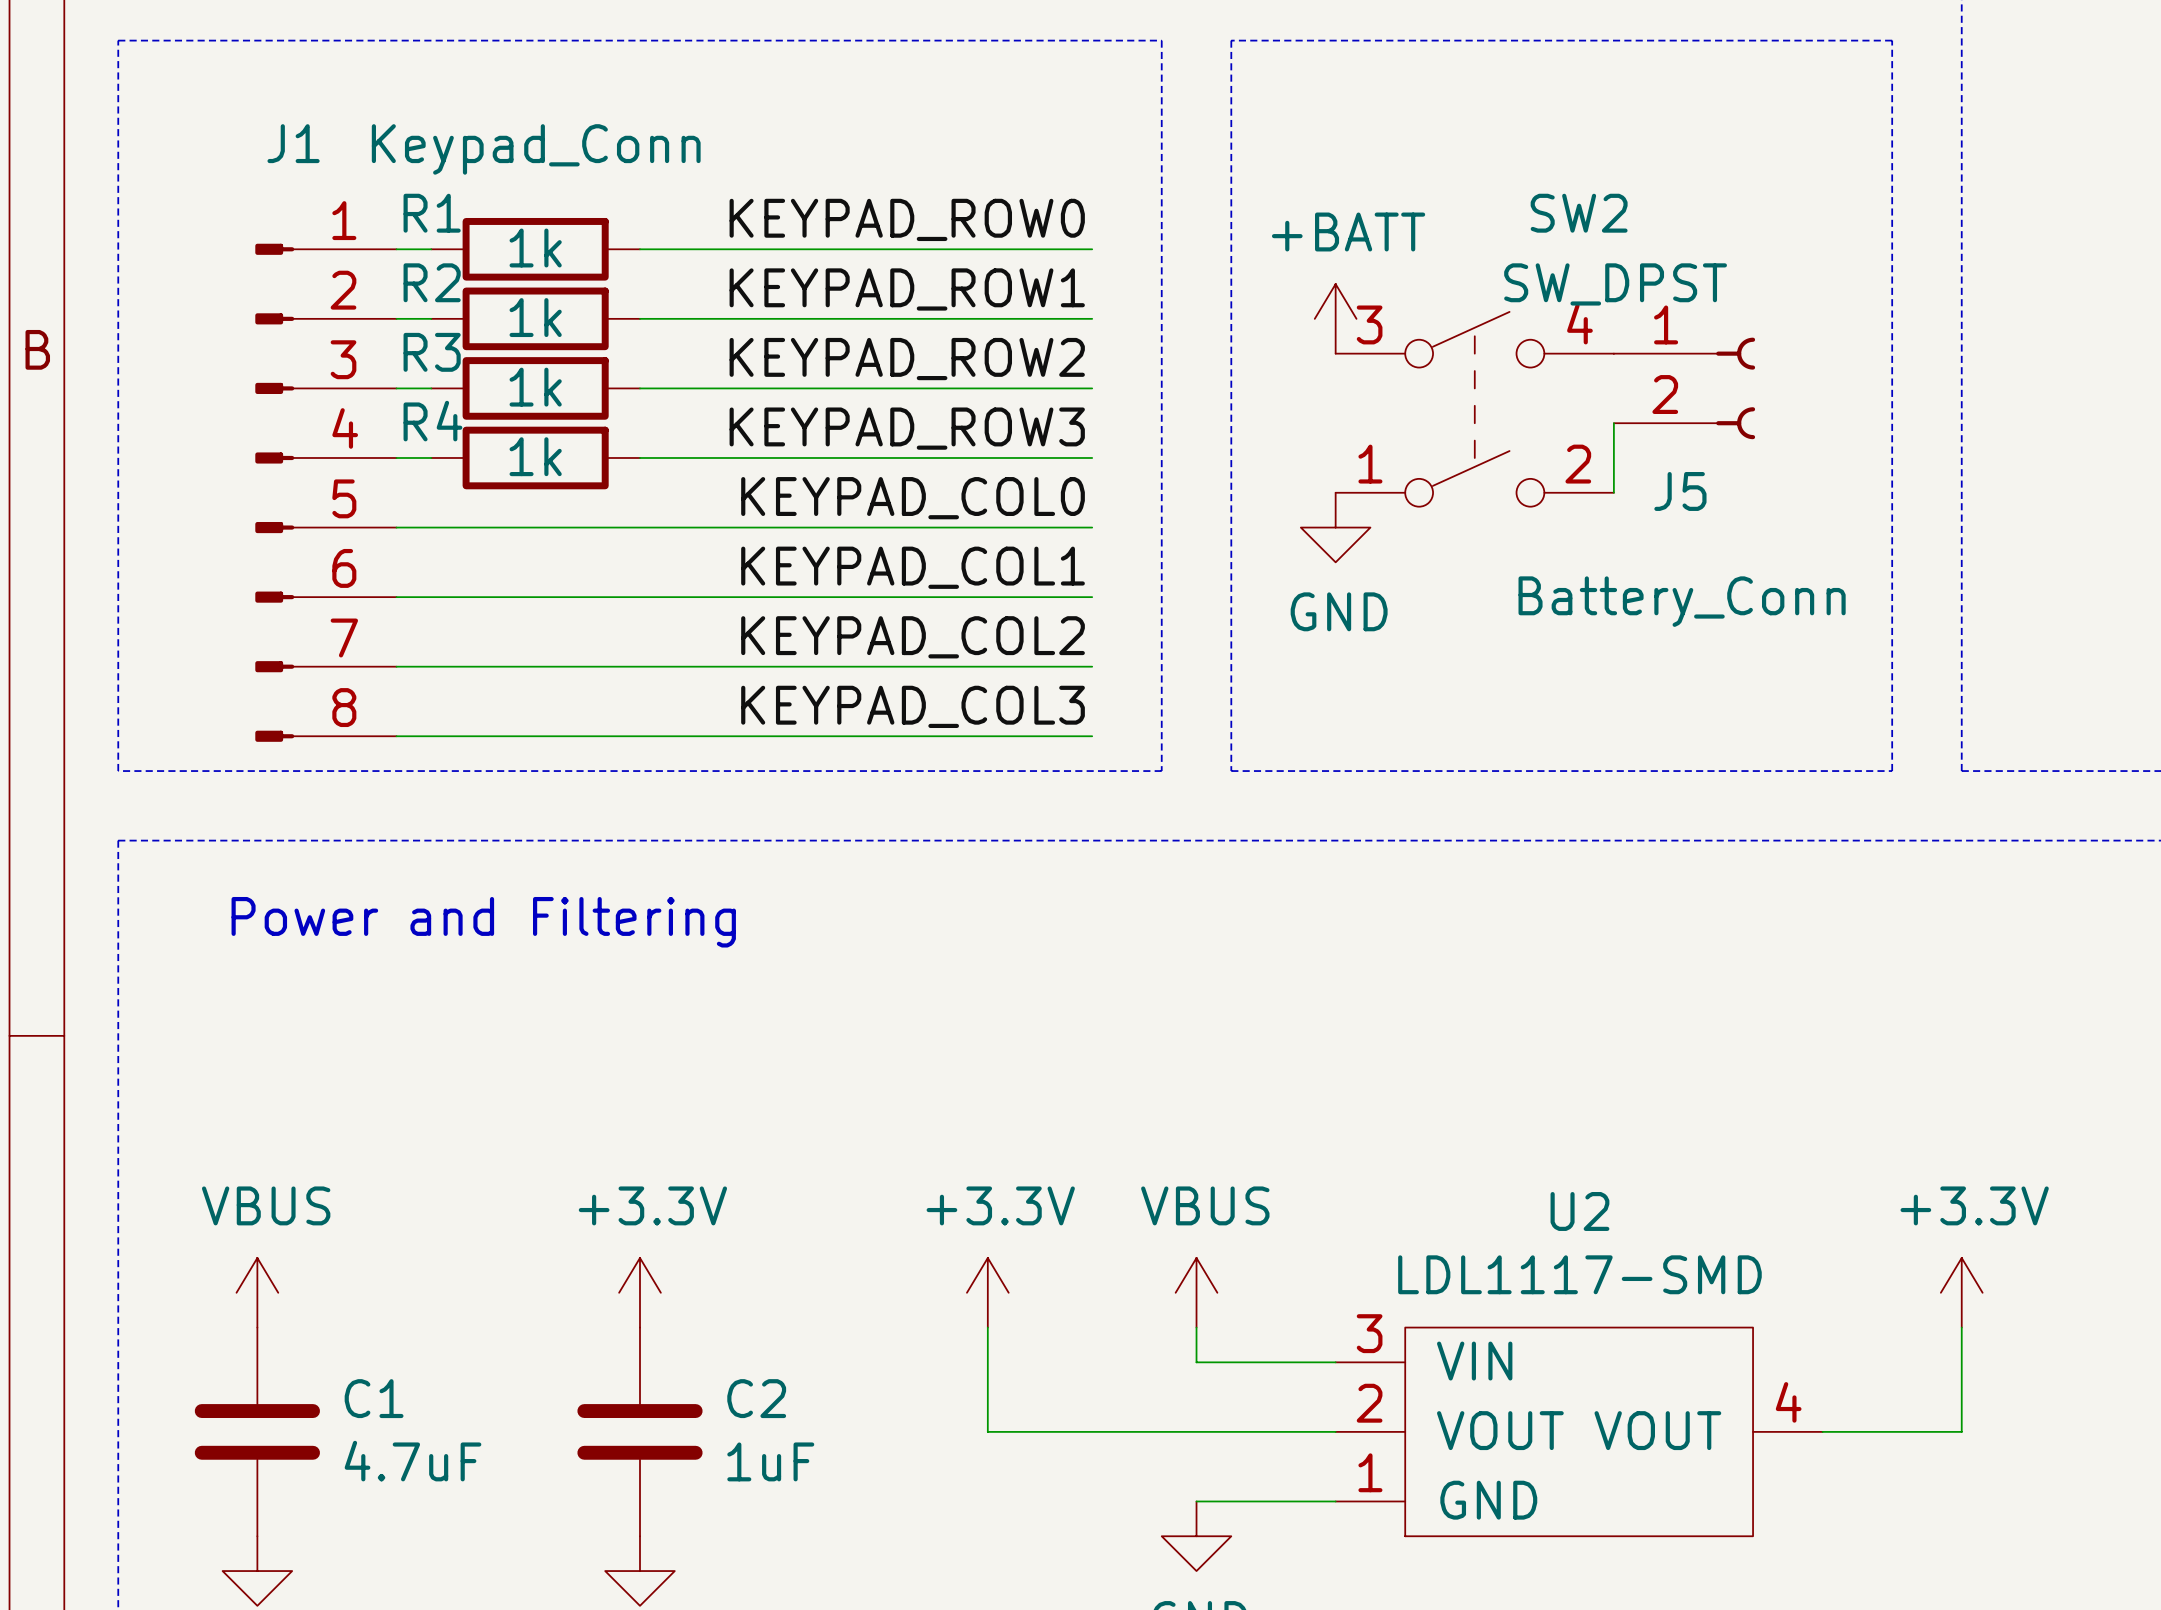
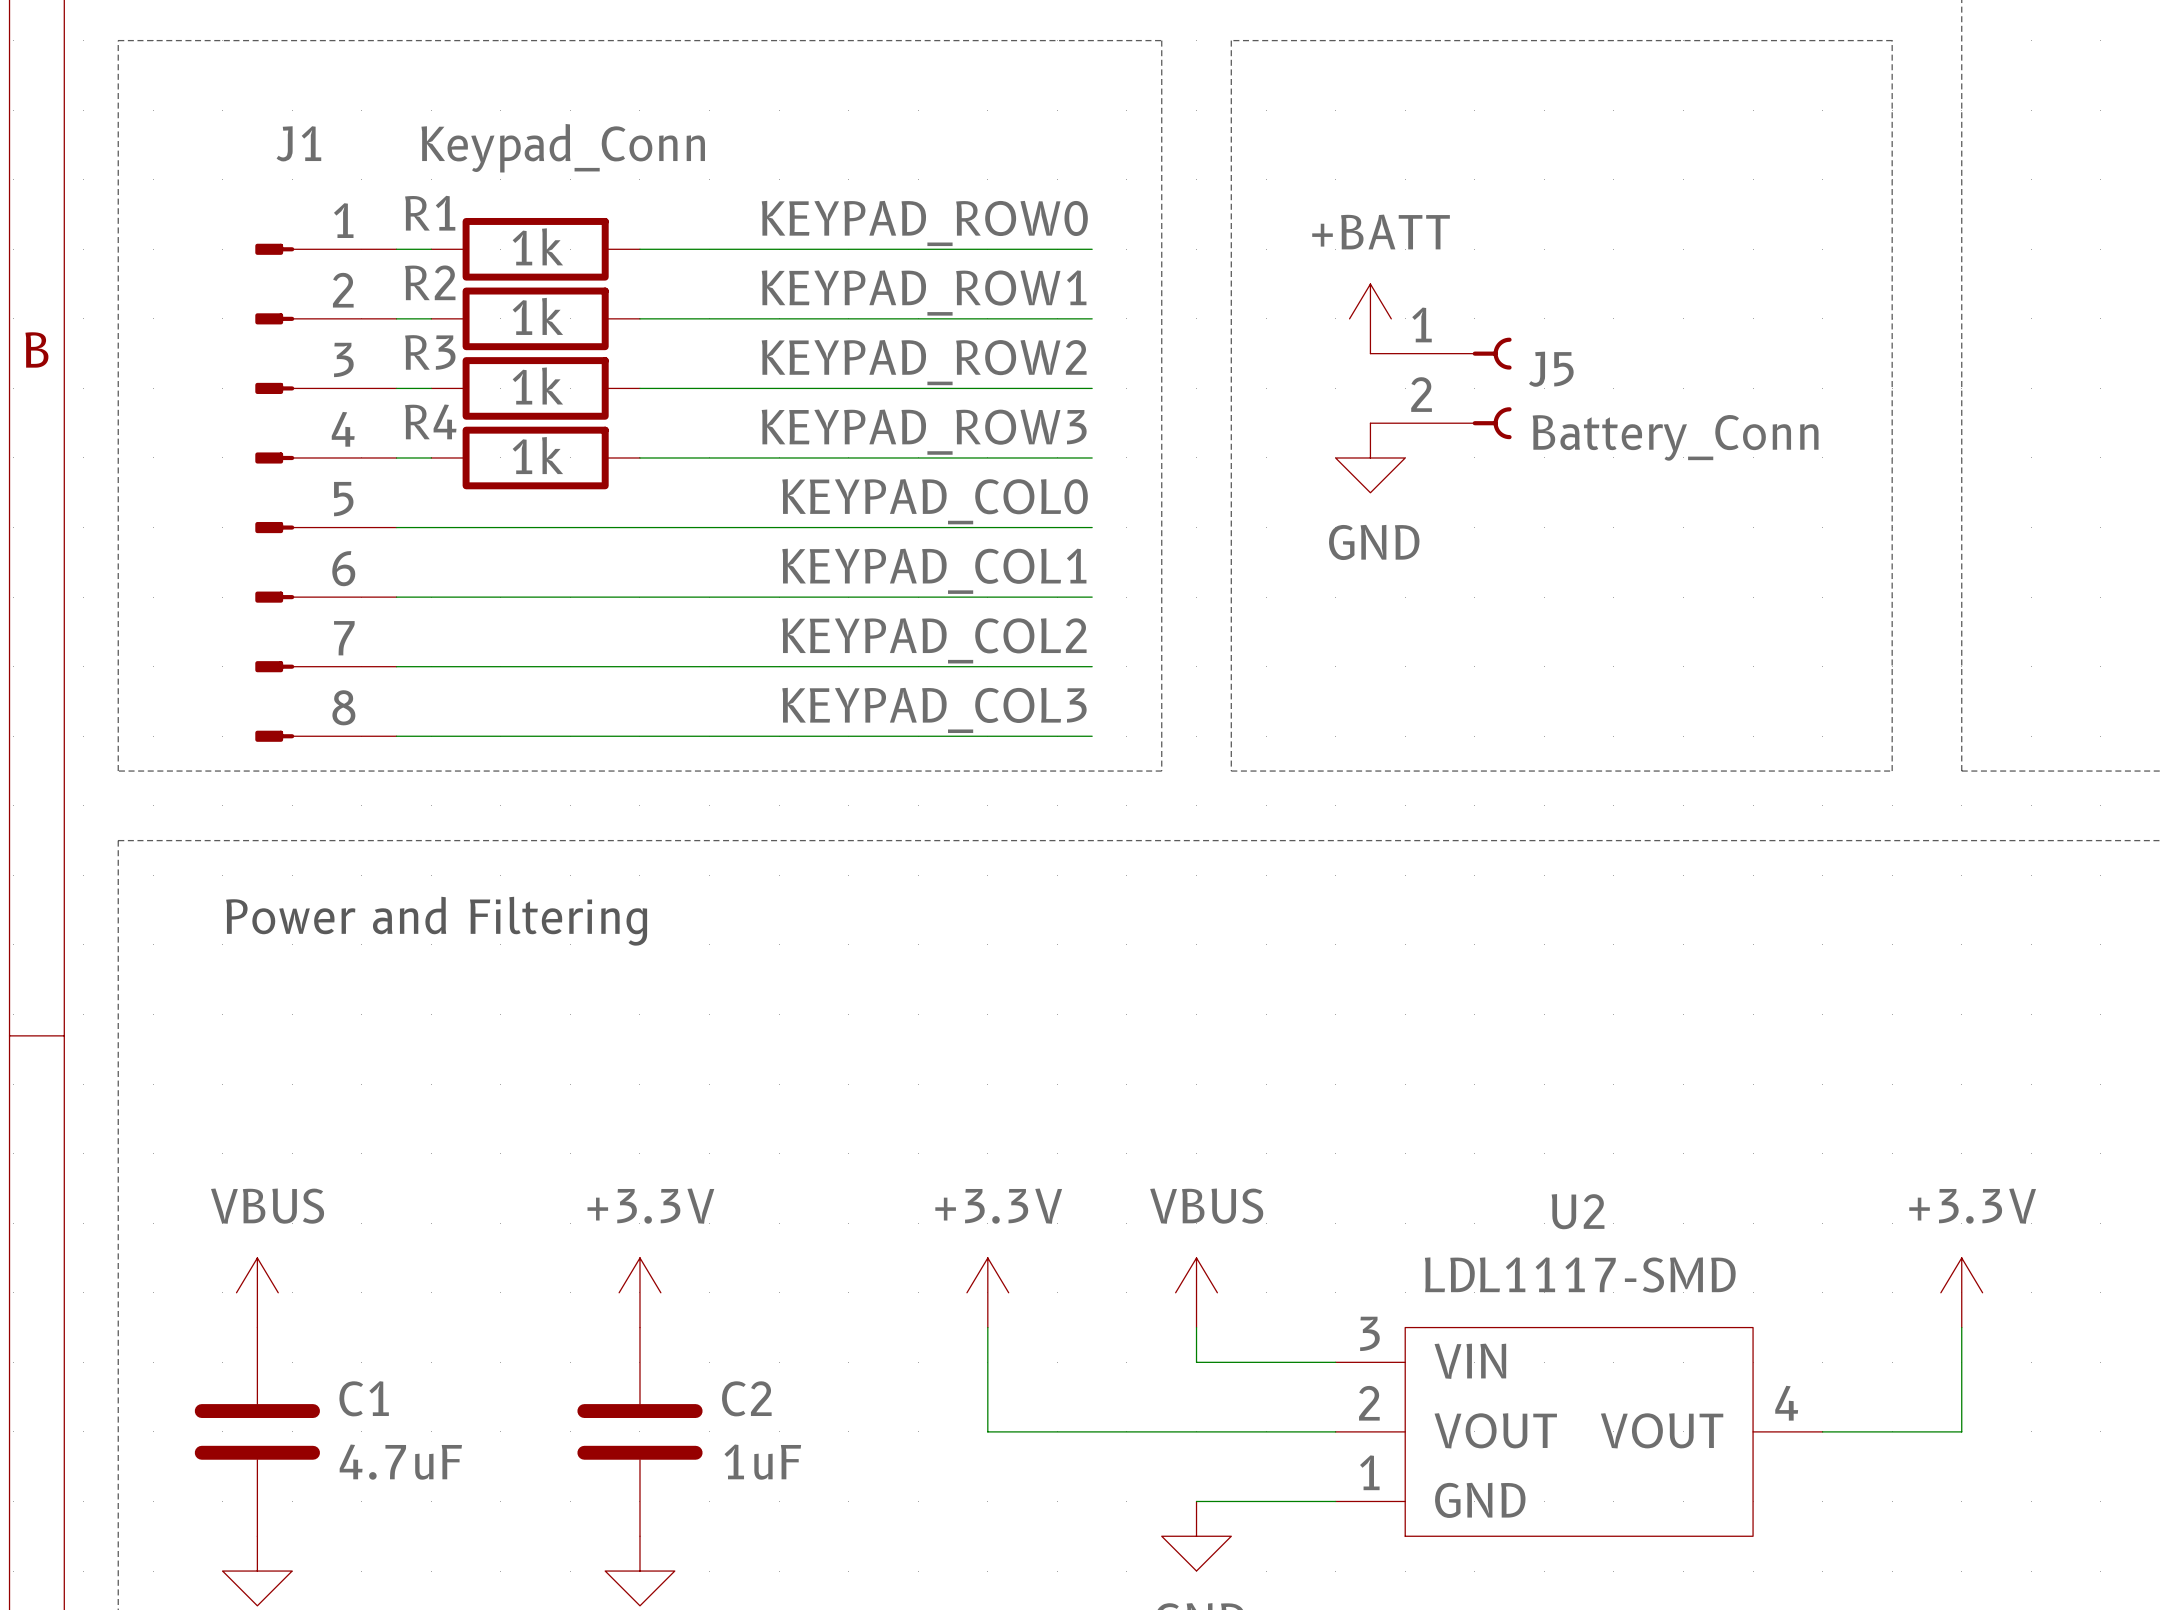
power symbol position: +BATT (1335, 318) -> +BATT (1370, 318)
J5 position: (1684, 388) -> (1441, 388)
SW2: SW_DPST (1474, 409) -> none
wire: (1613, 423) (1613, 492) -> none
J5 name position: J5 (1680, 491) -> J5 (1551, 369)
power symbol position: GND (1335, 527) -> GND (1370, 457)
J5 value position: Battery_Conn (1682, 601) -> Battery_Conn (1675, 437)

